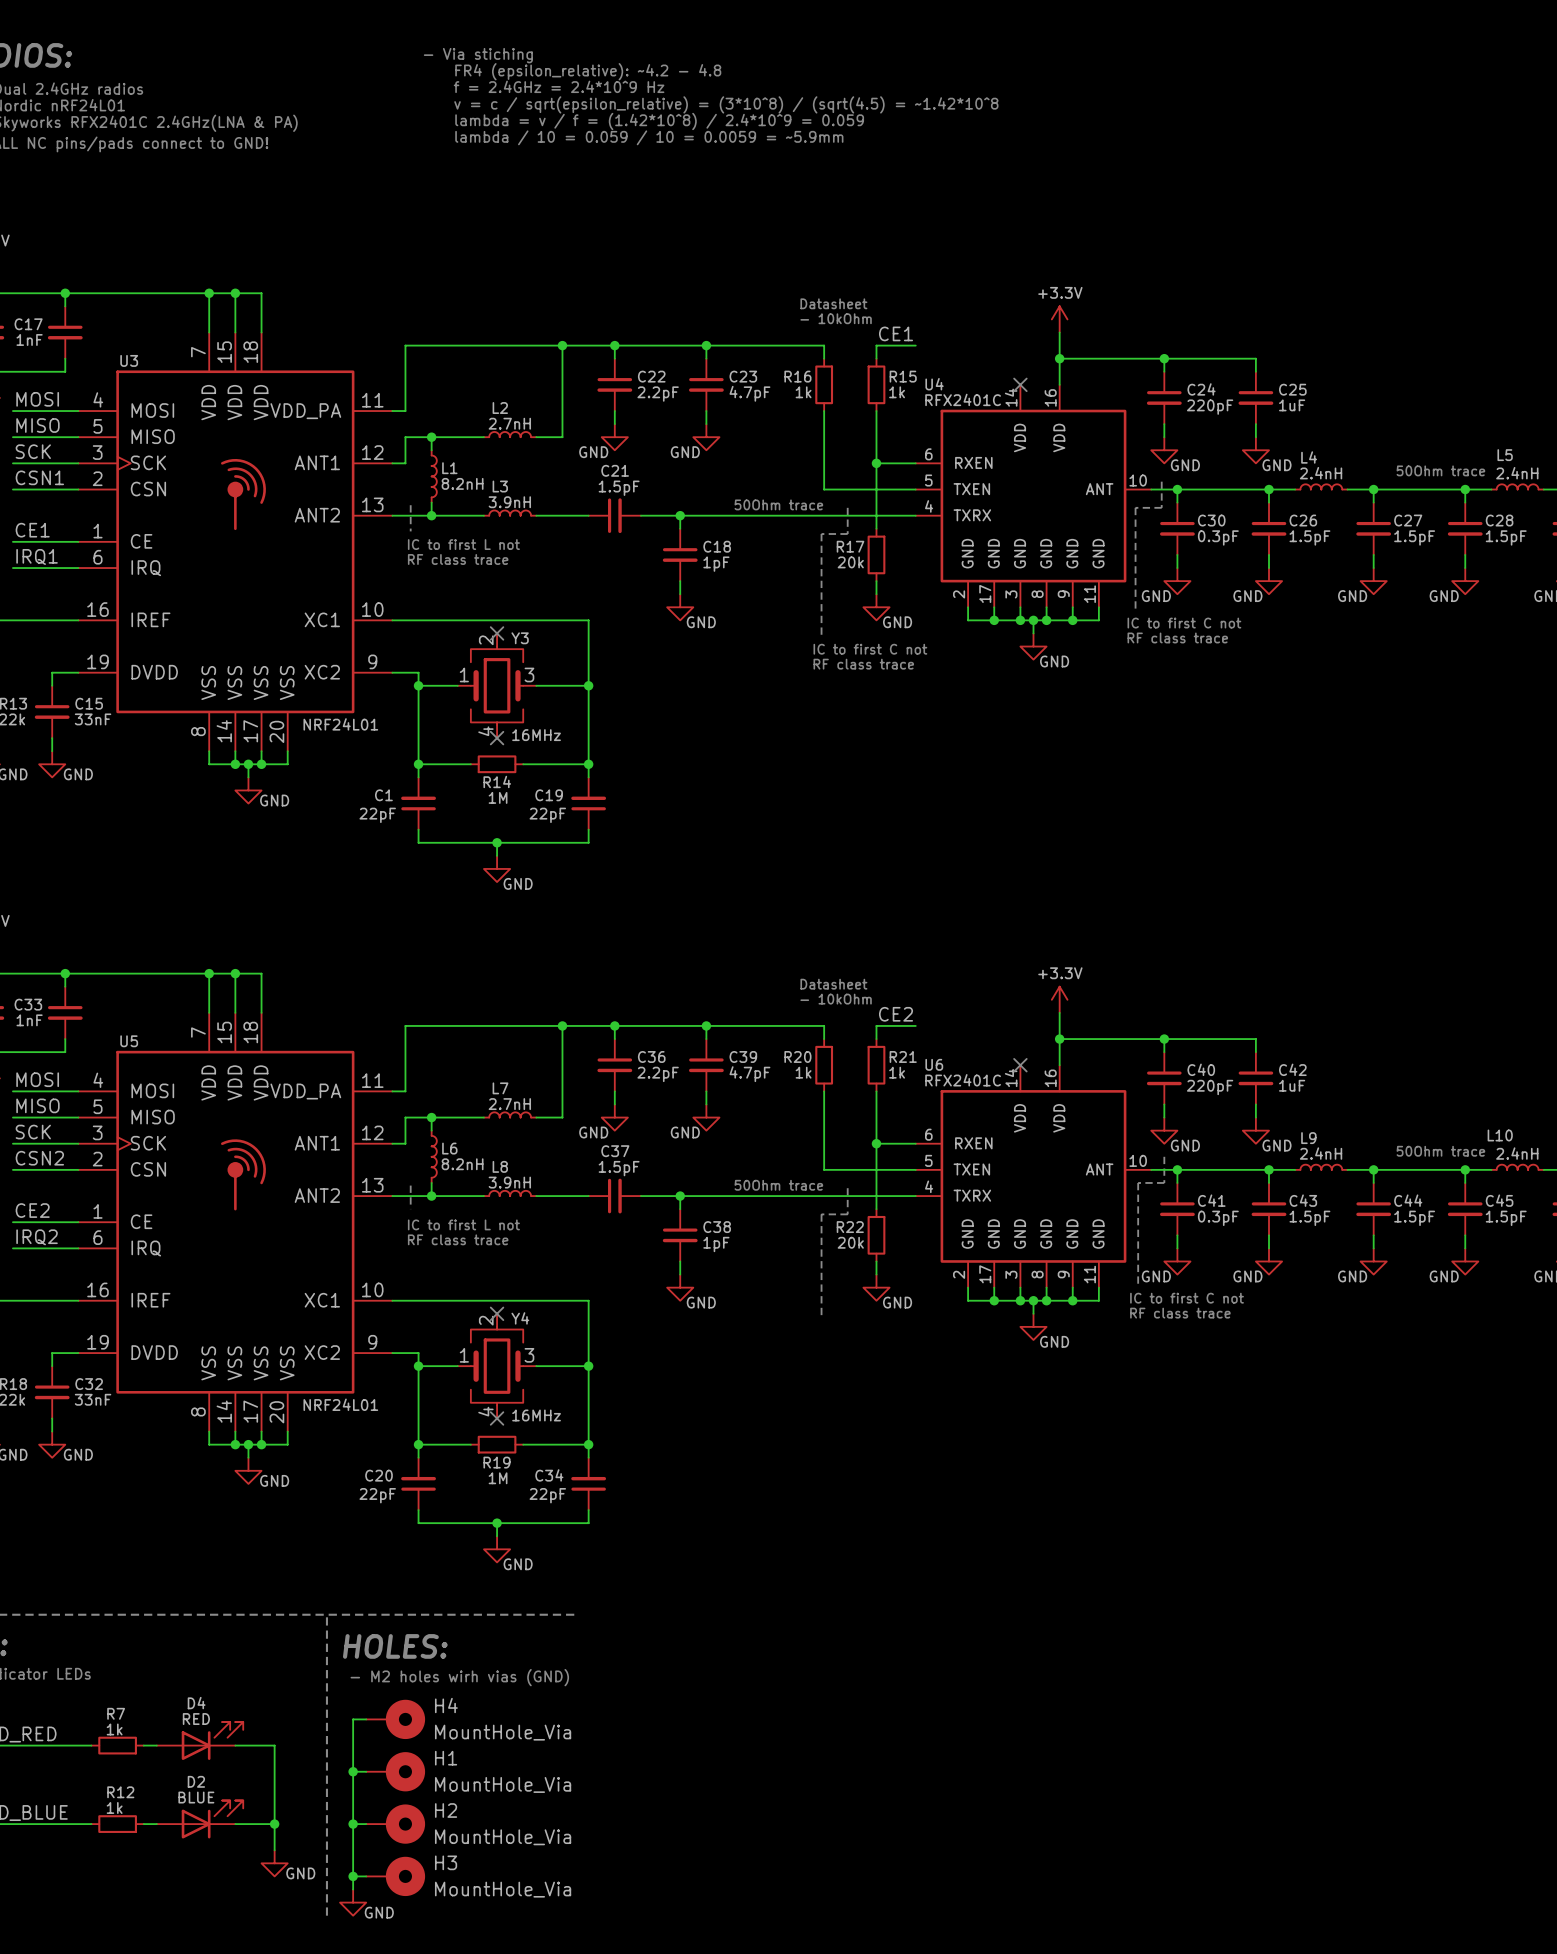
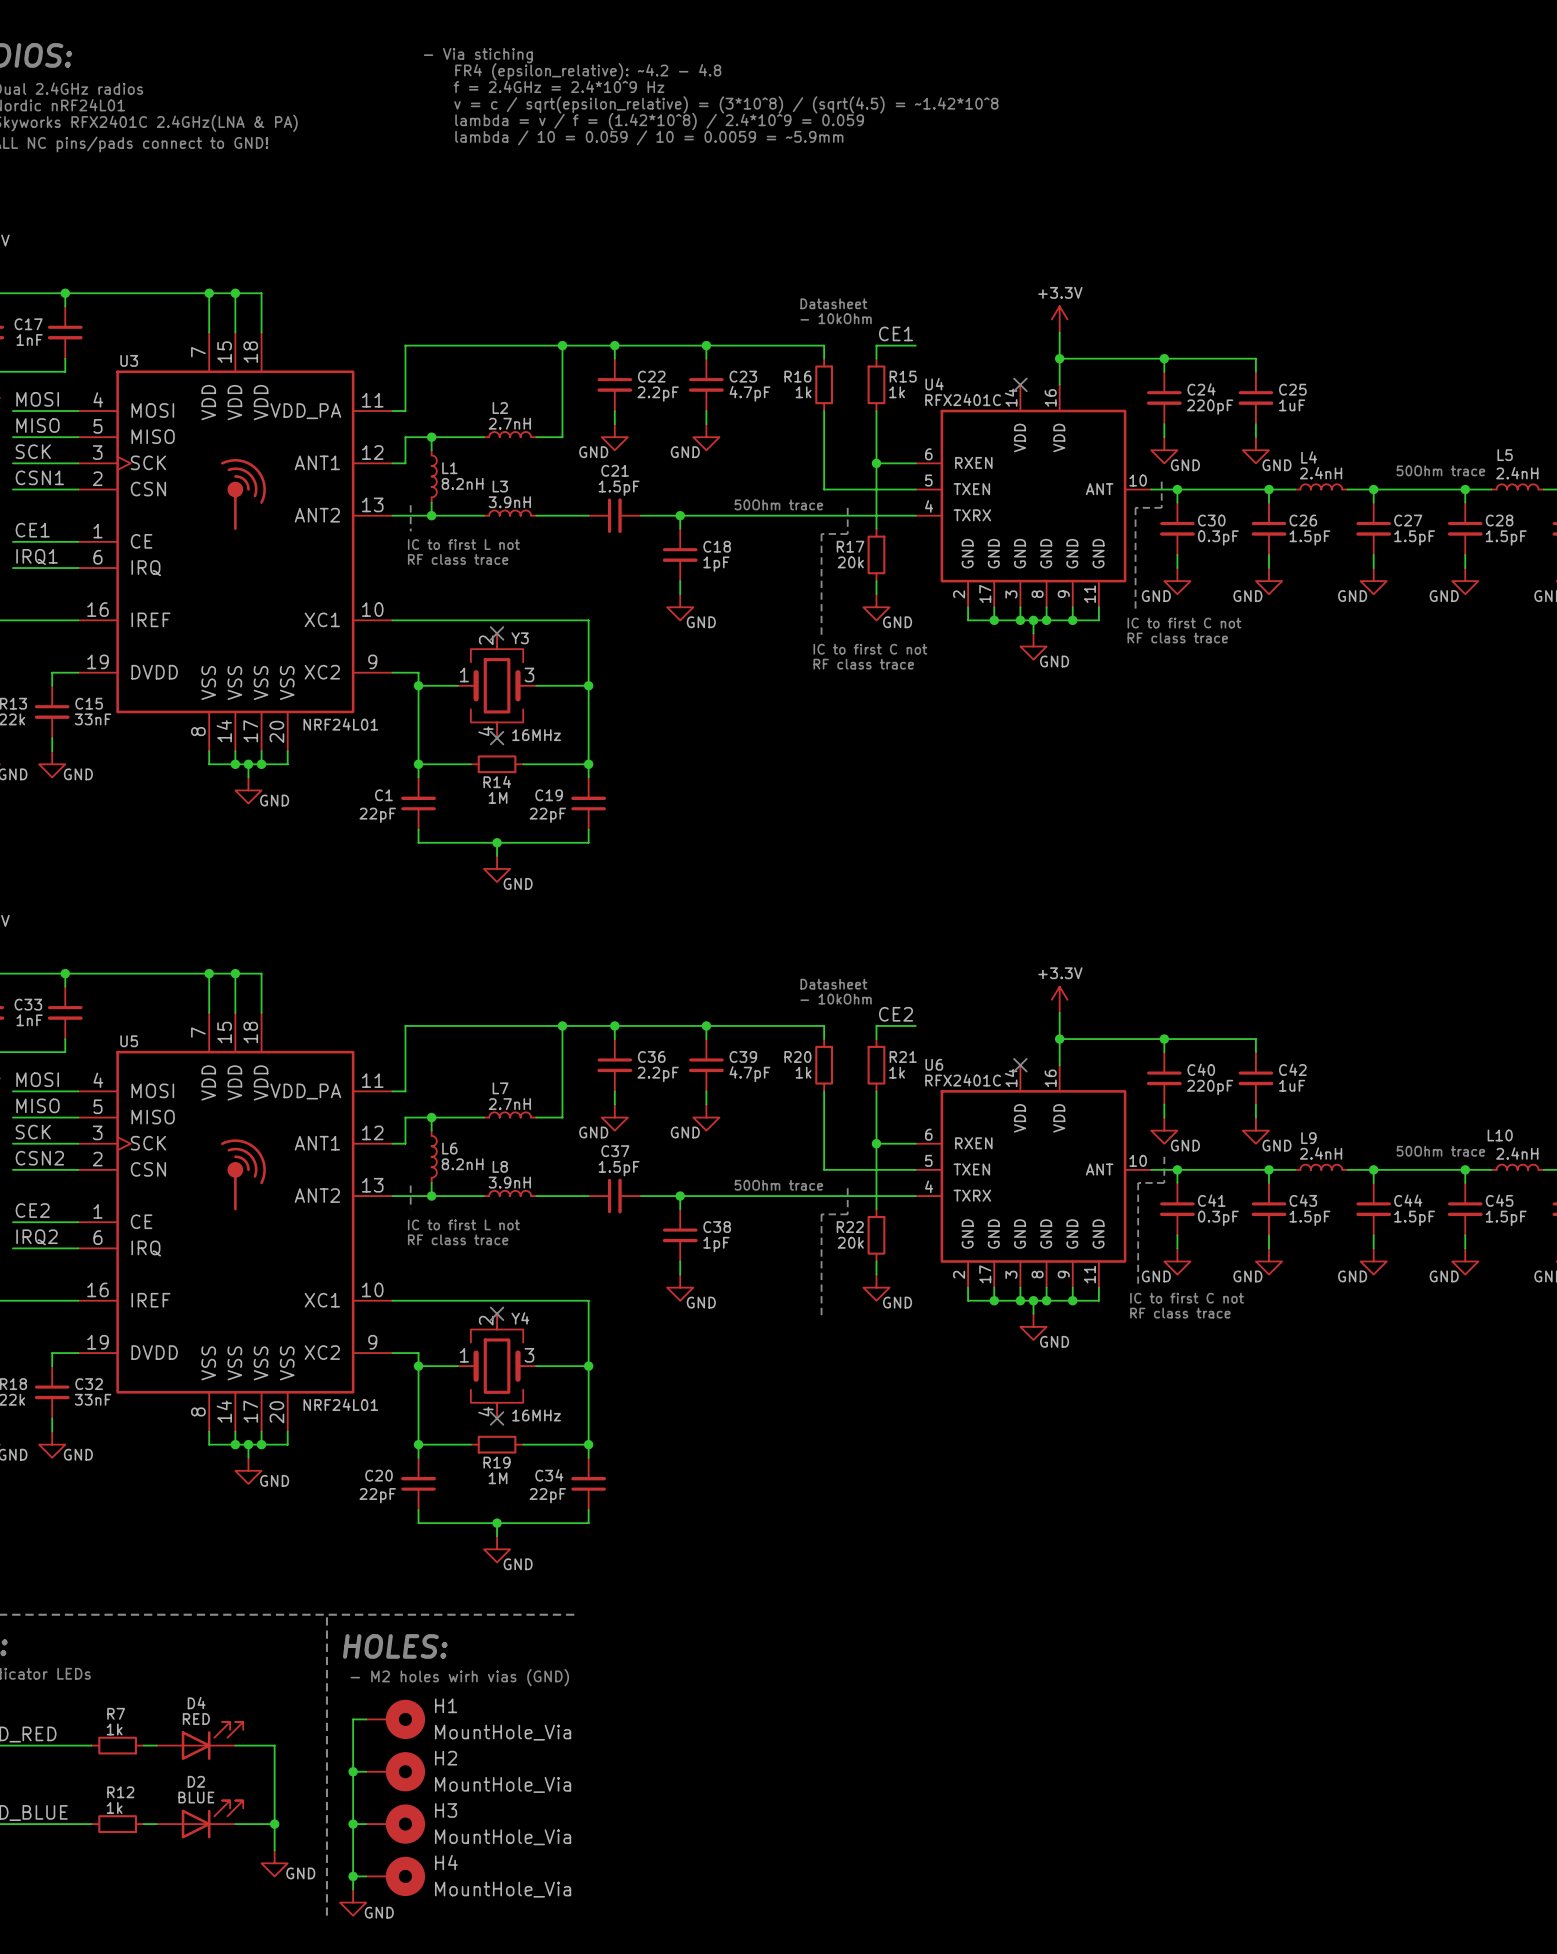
H4 name: H4 (446, 1705) -> H1 (446, 1705)
H1 name: H1 (446, 1758) -> H2 (446, 1758)
H2 name: H2 (446, 1810) -> H3 (446, 1810)
H3 name: H3 (446, 1862) -> H4 (446, 1862)

